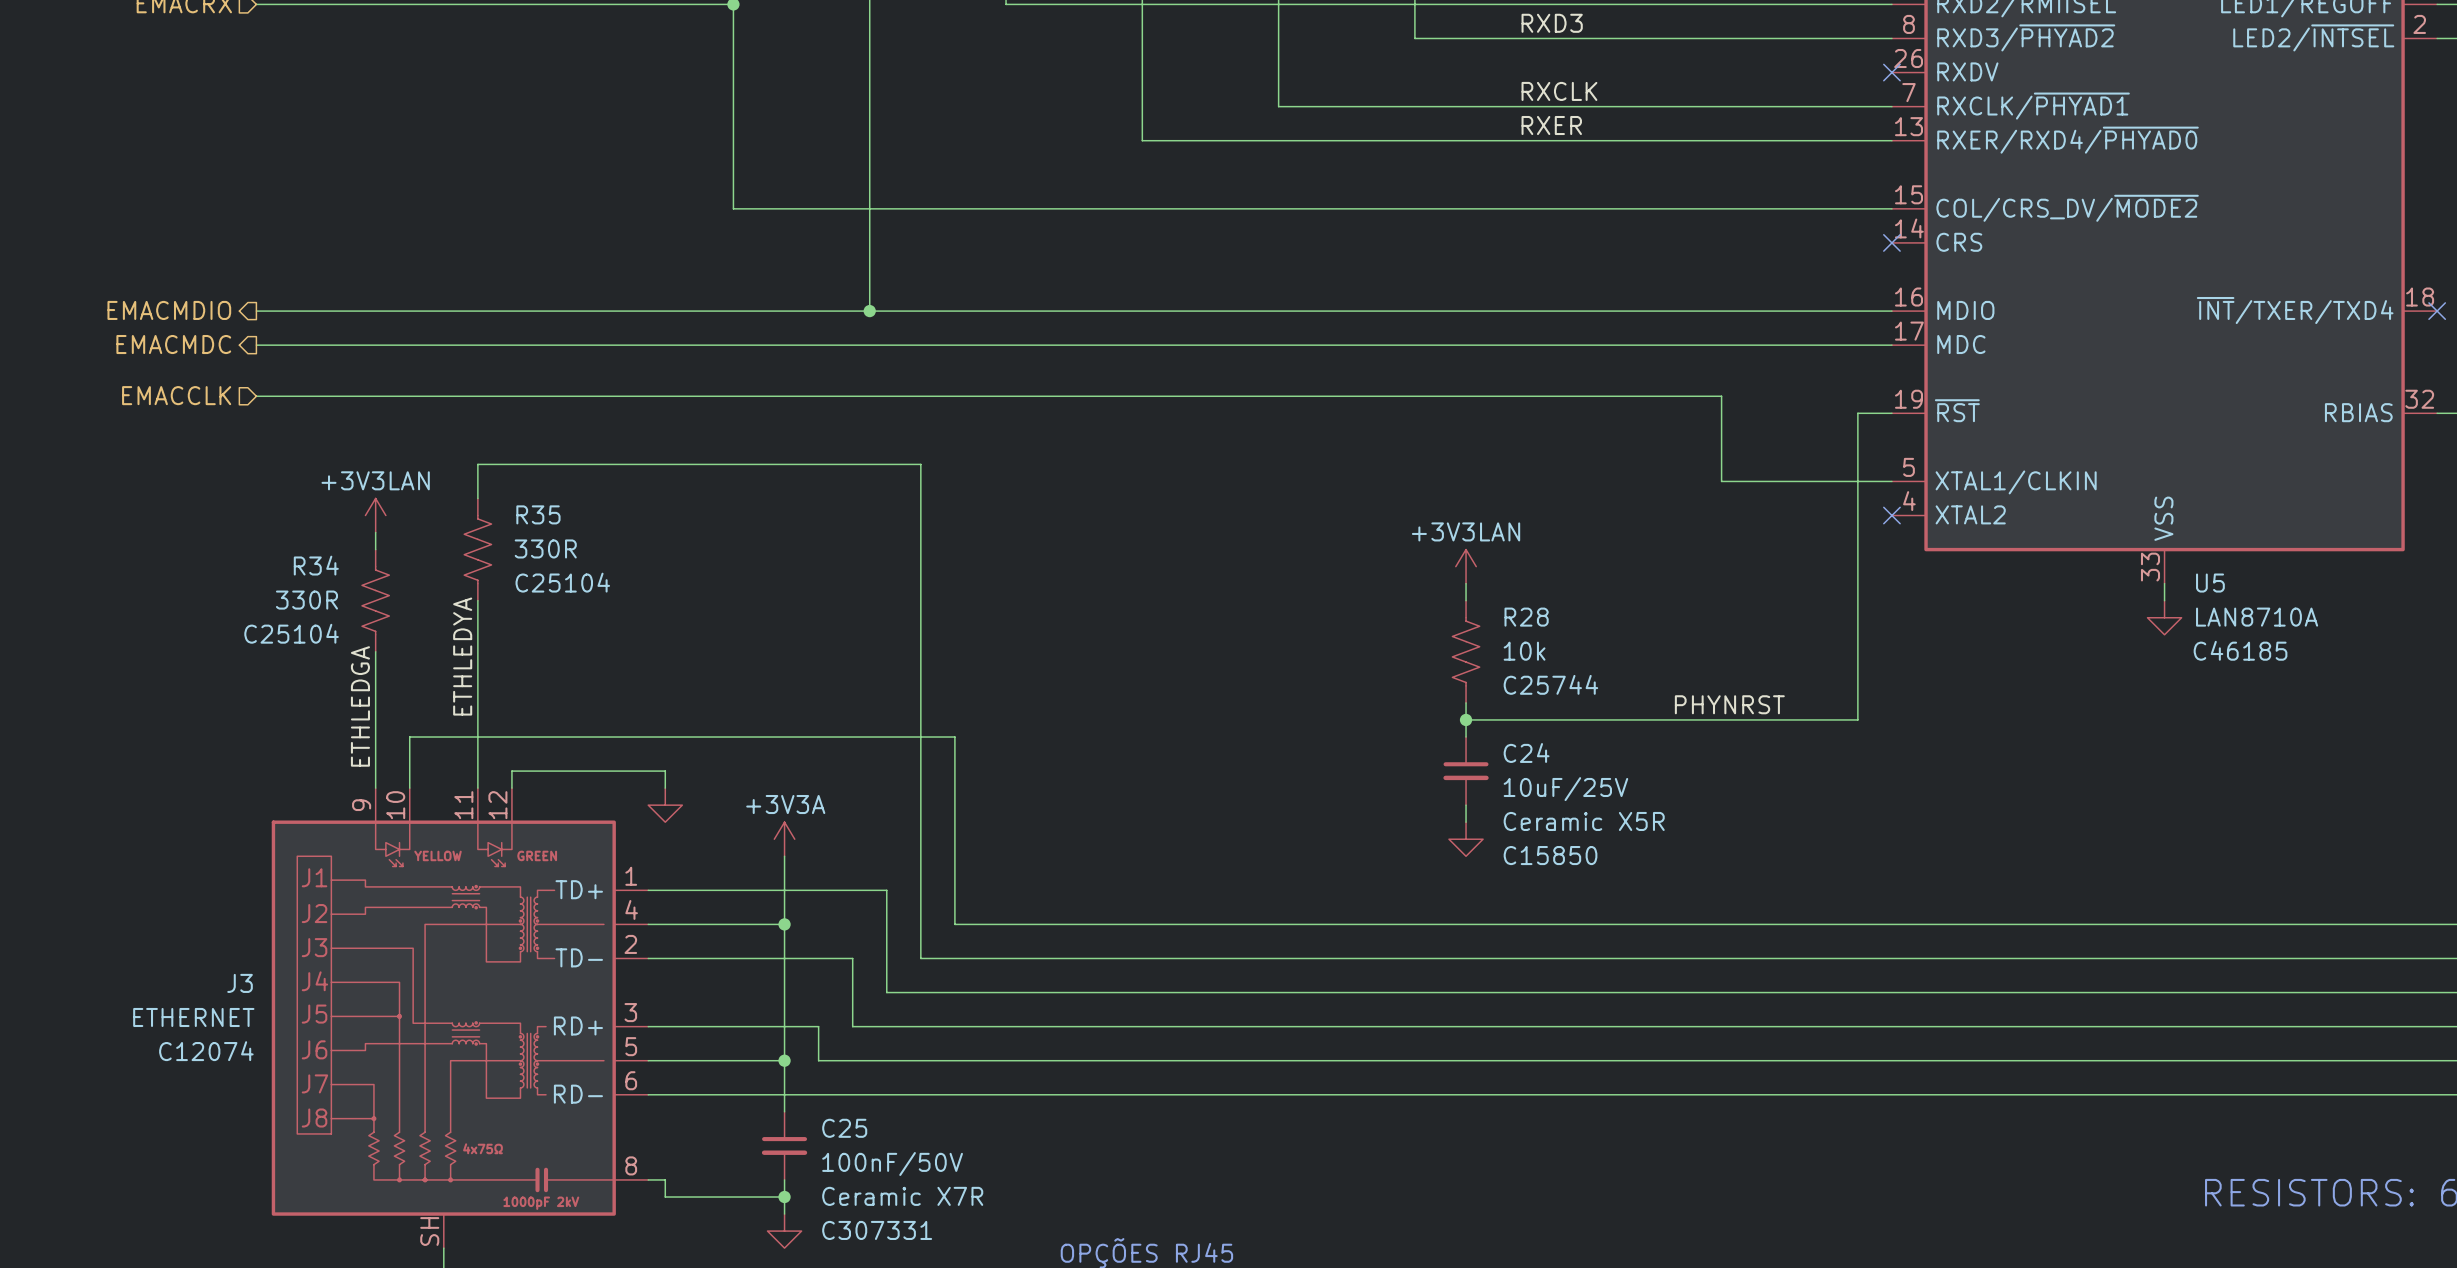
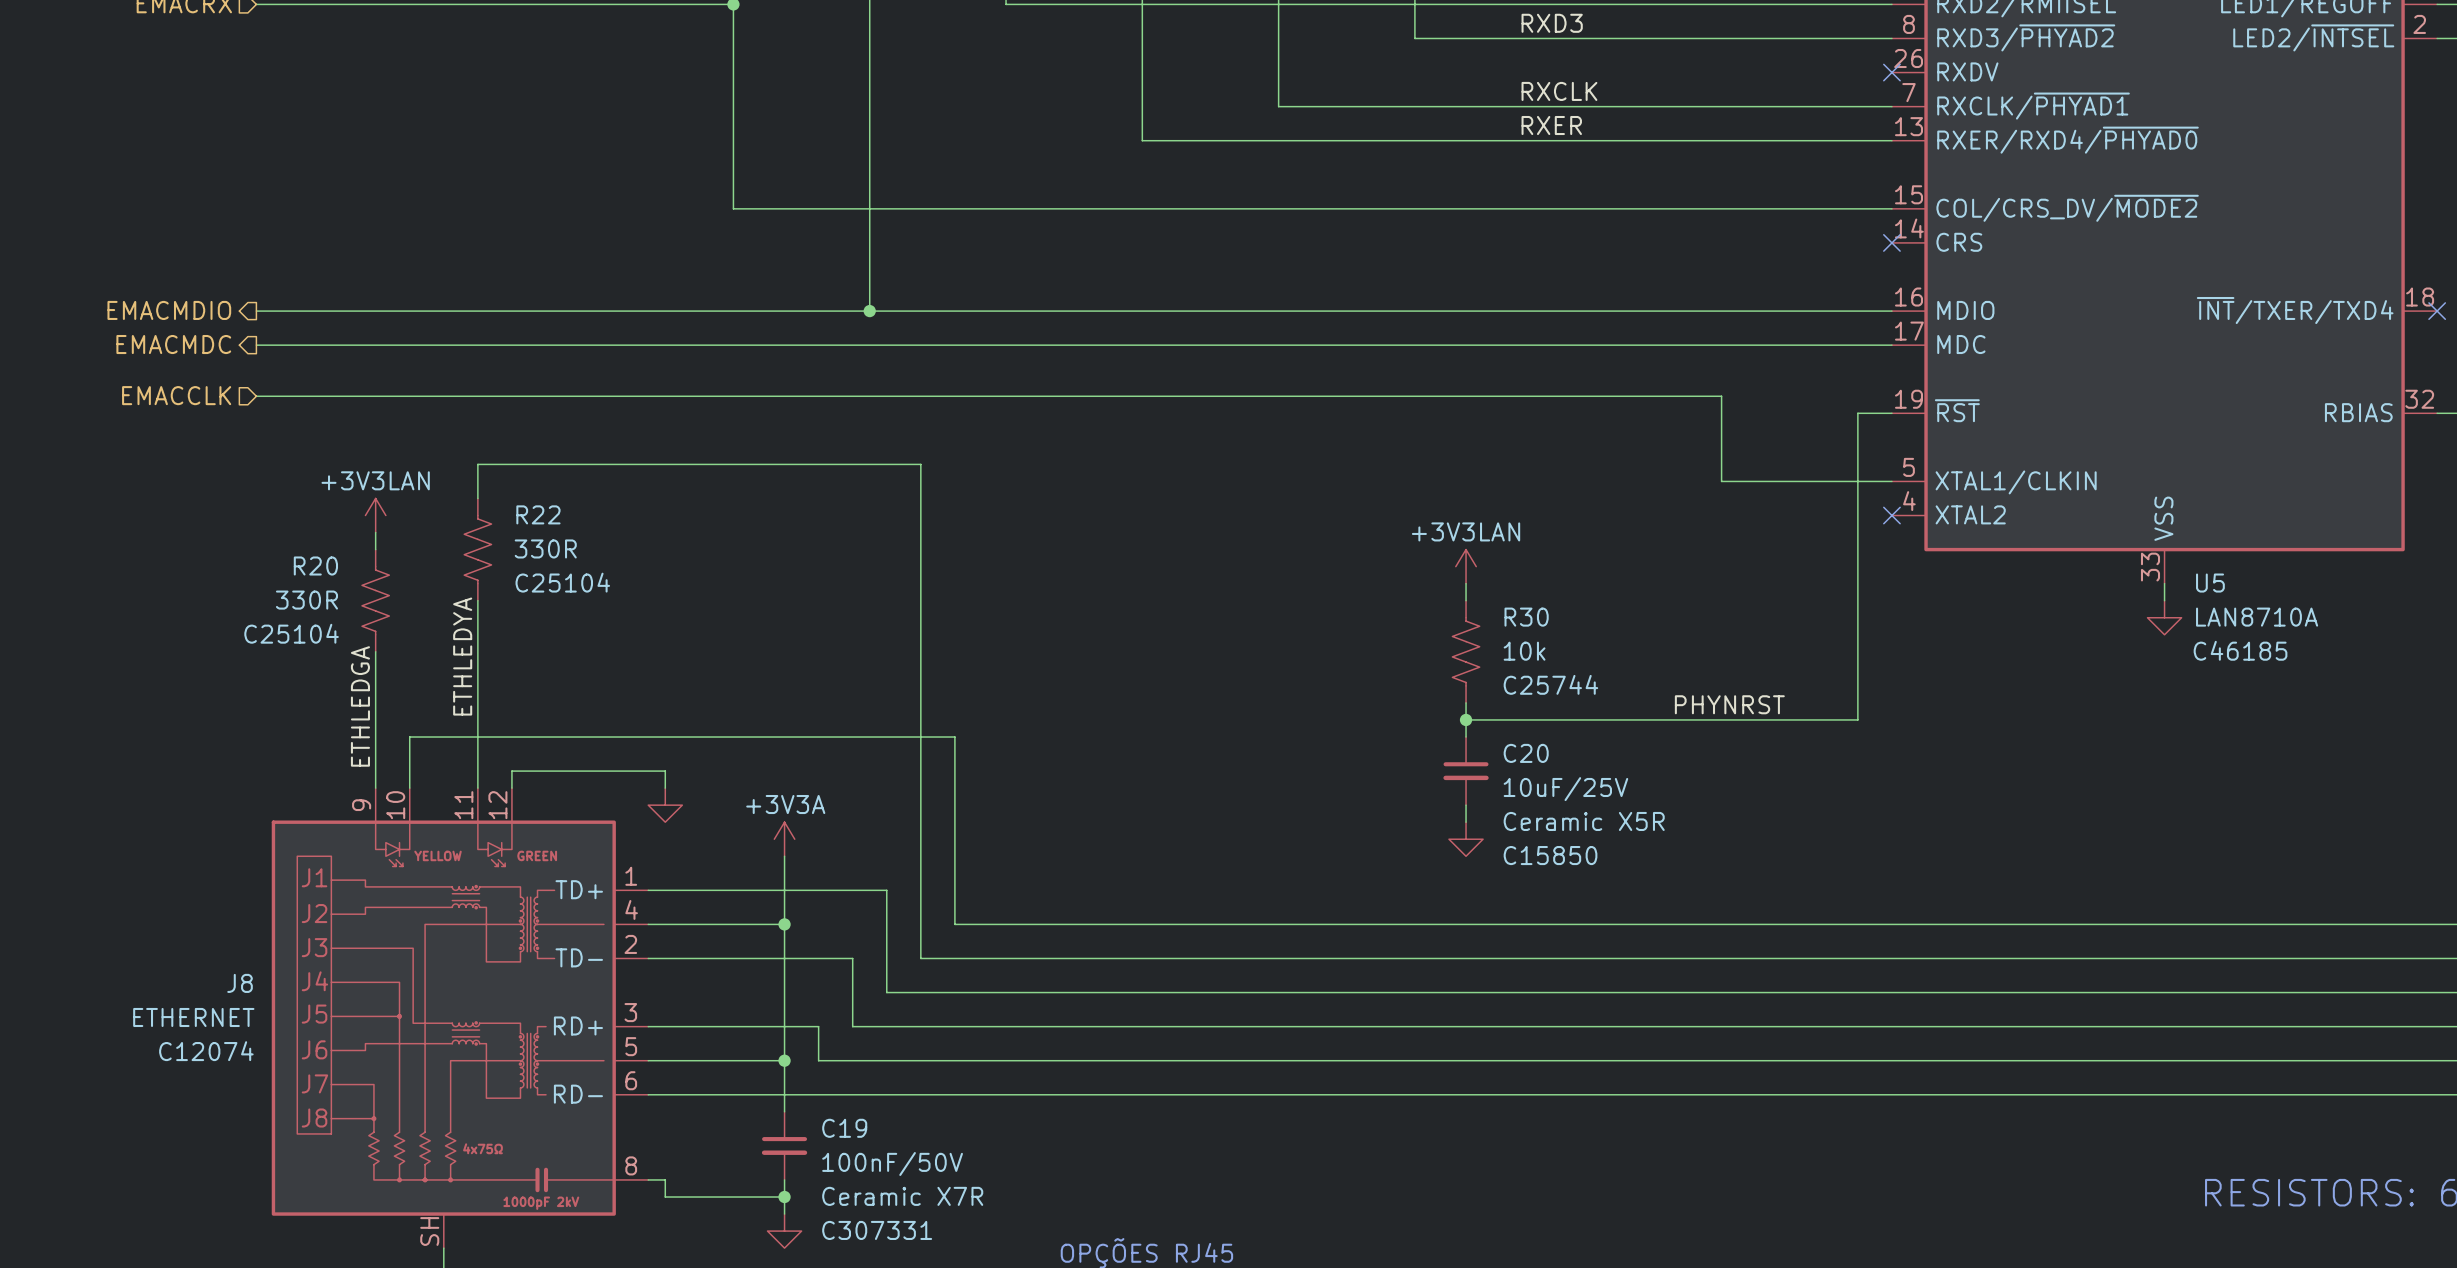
R35 name: R35 (538, 514) -> R22 (538, 514)
R34 name: R34 (316, 565) -> R20 (315, 566)
R28 name: R28 (1526, 617) -> R30 (1526, 617)
C24 name: C24 (1526, 753) -> C20 (1526, 753)
J3 name: J3 (240, 983) -> J8 (240, 983)
C25 name: C25 (844, 1128) -> C19 (844, 1128)

